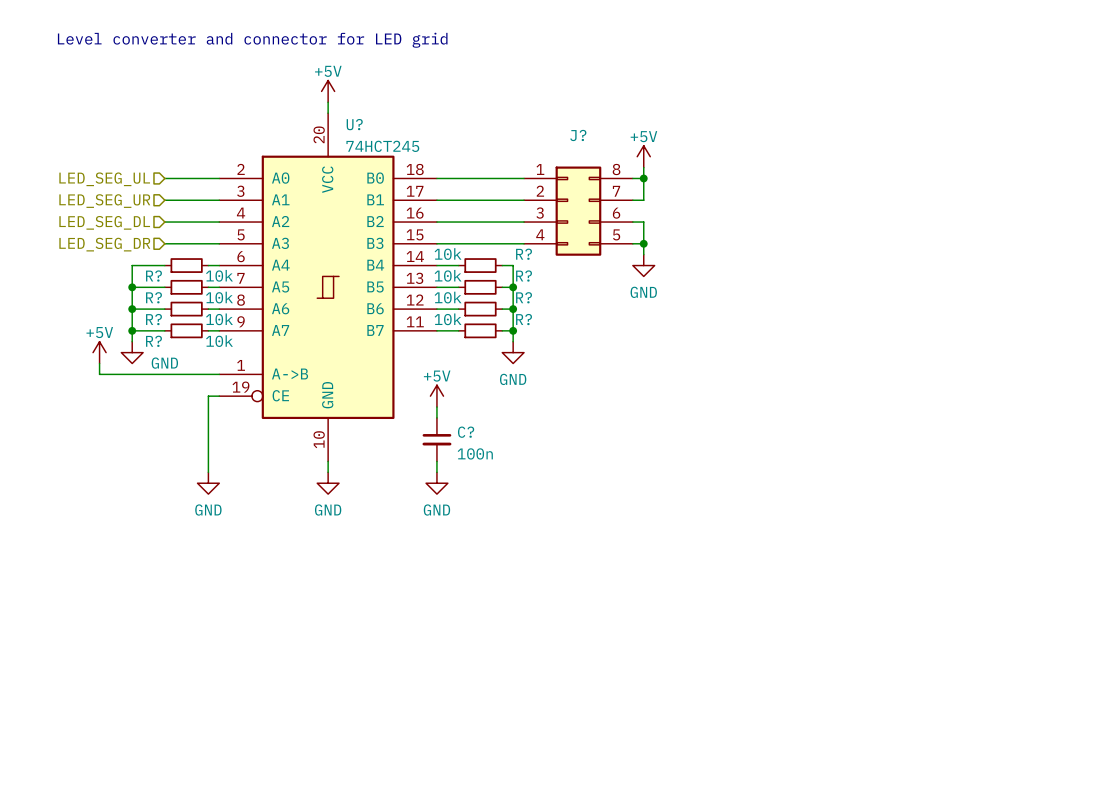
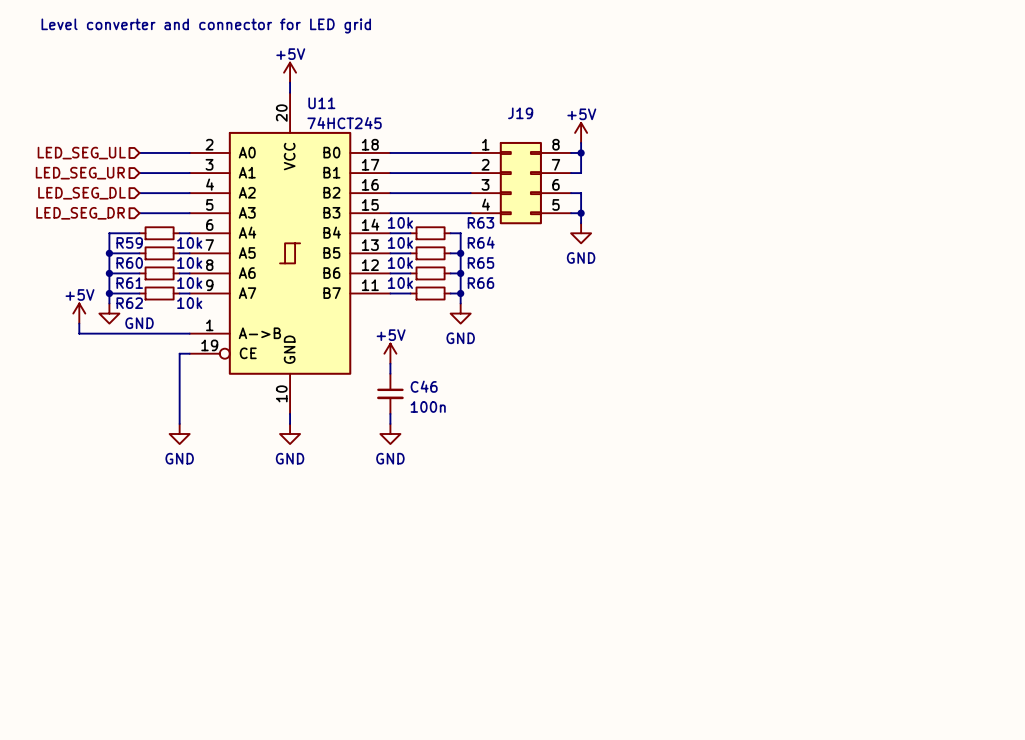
U? name: U? (354, 124) -> U11 (321, 103)
J? name: J? (578, 135) -> J19 (520, 113)
R? name: R? (524, 254) -> R63 (480, 222)
R? name: R? (153, 276) -> R59 (129, 242)
R? name: R? (524, 276) -> R64 (481, 242)
R? name: R? (153, 297) -> R60 (129, 263)
R? name: R? (524, 297) -> R65 (480, 263)
R? name: R? (153, 319) -> R61 (129, 283)
R? name: R? (524, 319) -> R66 (480, 283)
R? name: R? (153, 341) -> R62 (129, 303)
C? name: C? (466, 432) -> C46 (424, 386)

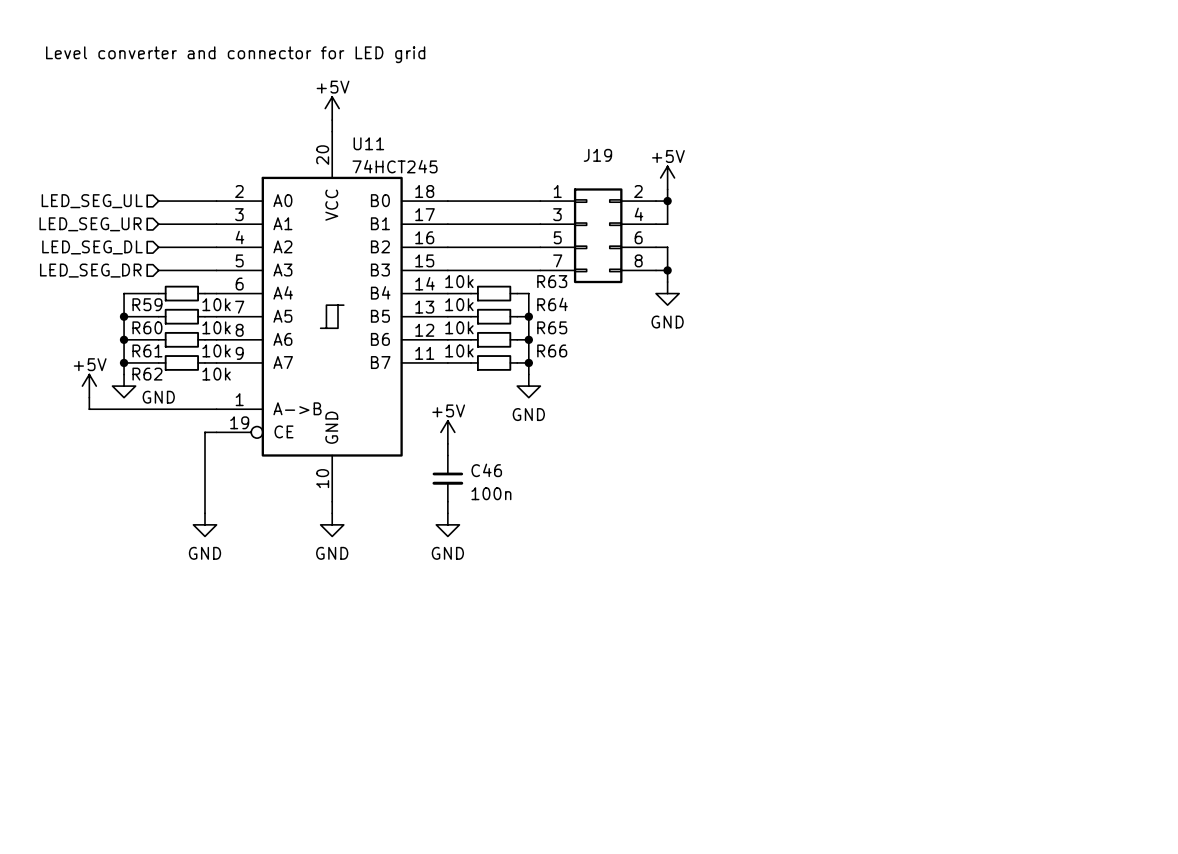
J19 pin number: 8 (556, 144) -> 2 (638, 191)
J19 pin number: 2 (485, 164) -> 3 (557, 214)
J19 pin number: 7 (556, 164) -> 4 (638, 214)
J19 pin number: 3 (485, 184) -> 5 (557, 237)
J19 pin number: 4 (485, 204) -> 7 (557, 260)
J19 pin number: 5 (556, 204) -> 8 (638, 260)

